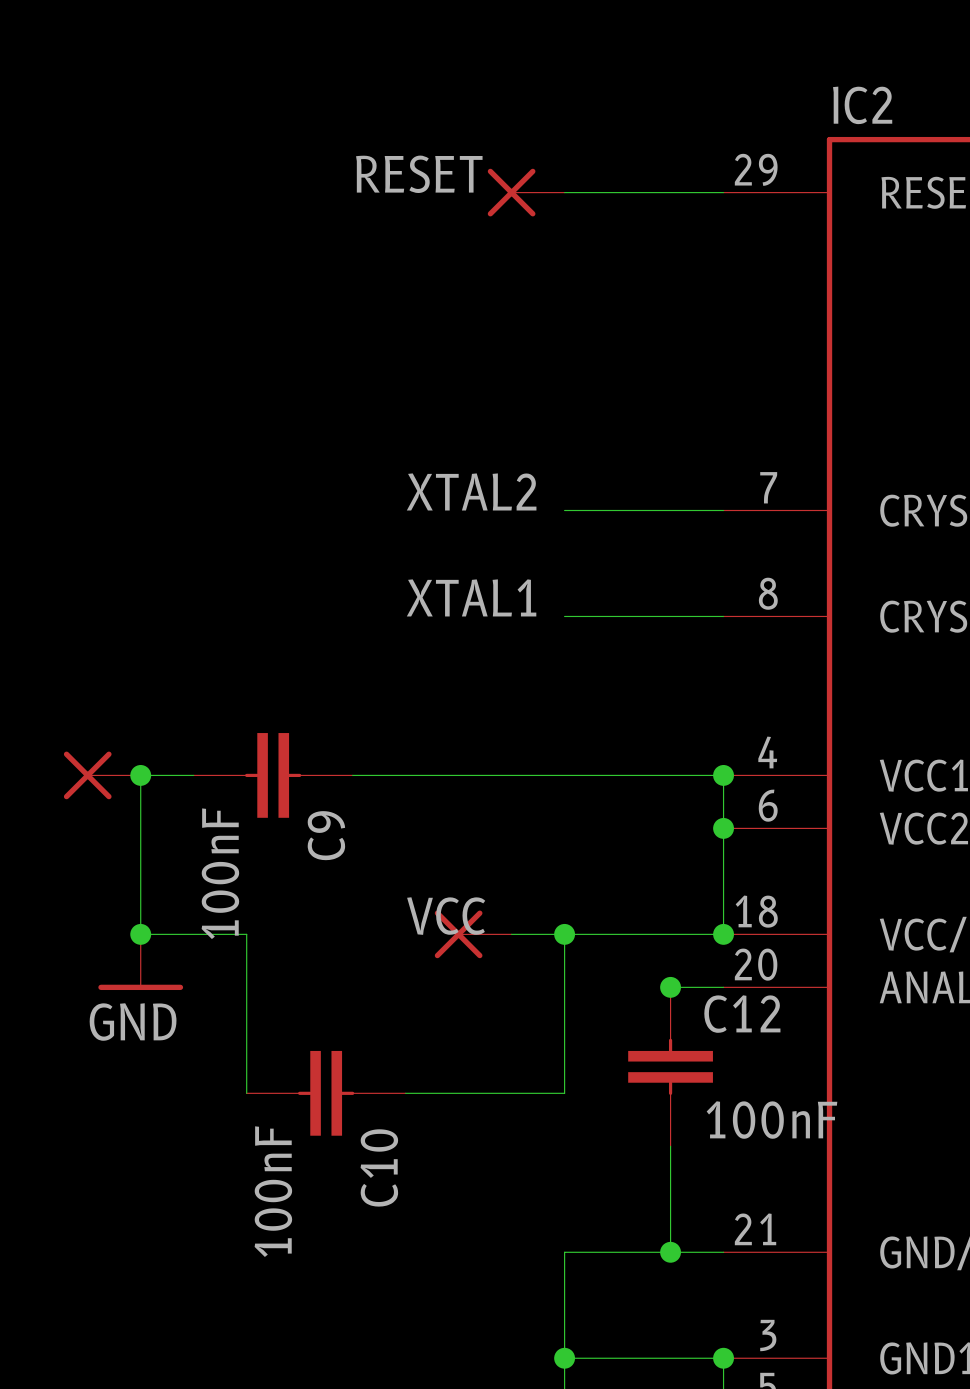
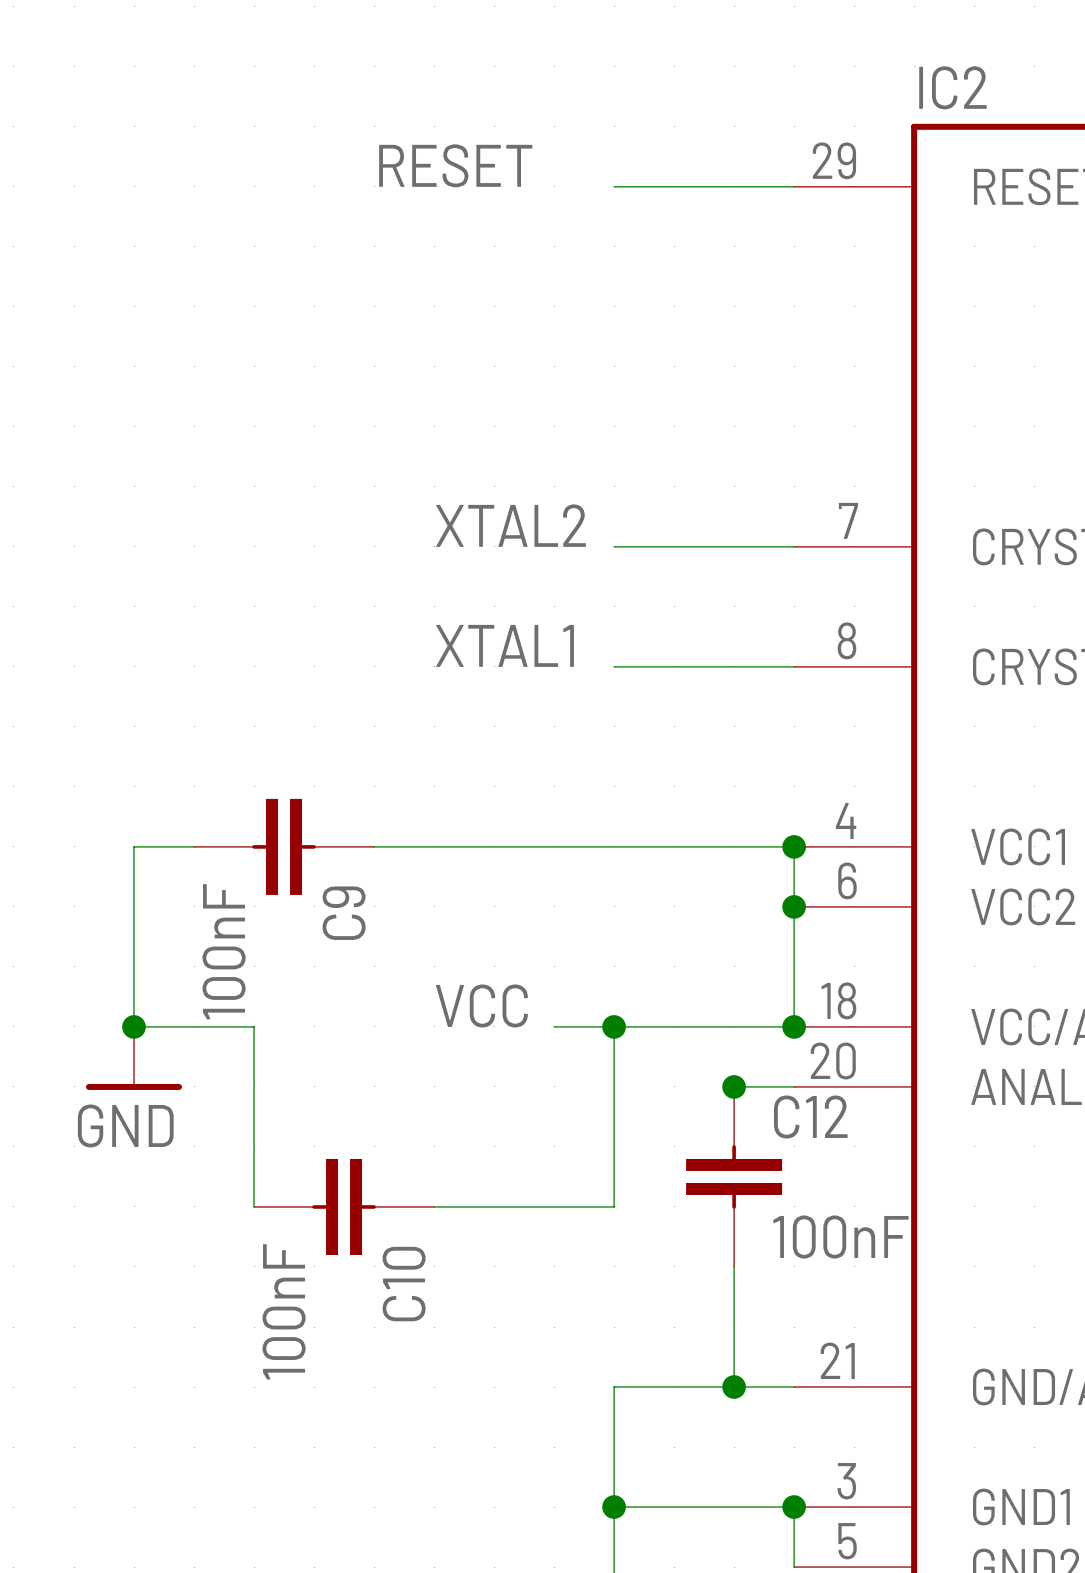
part: (526, 192) -> none
part: (102, 775) -> none
junction: (140, 775) -> none
part: (473, 934) -> none

